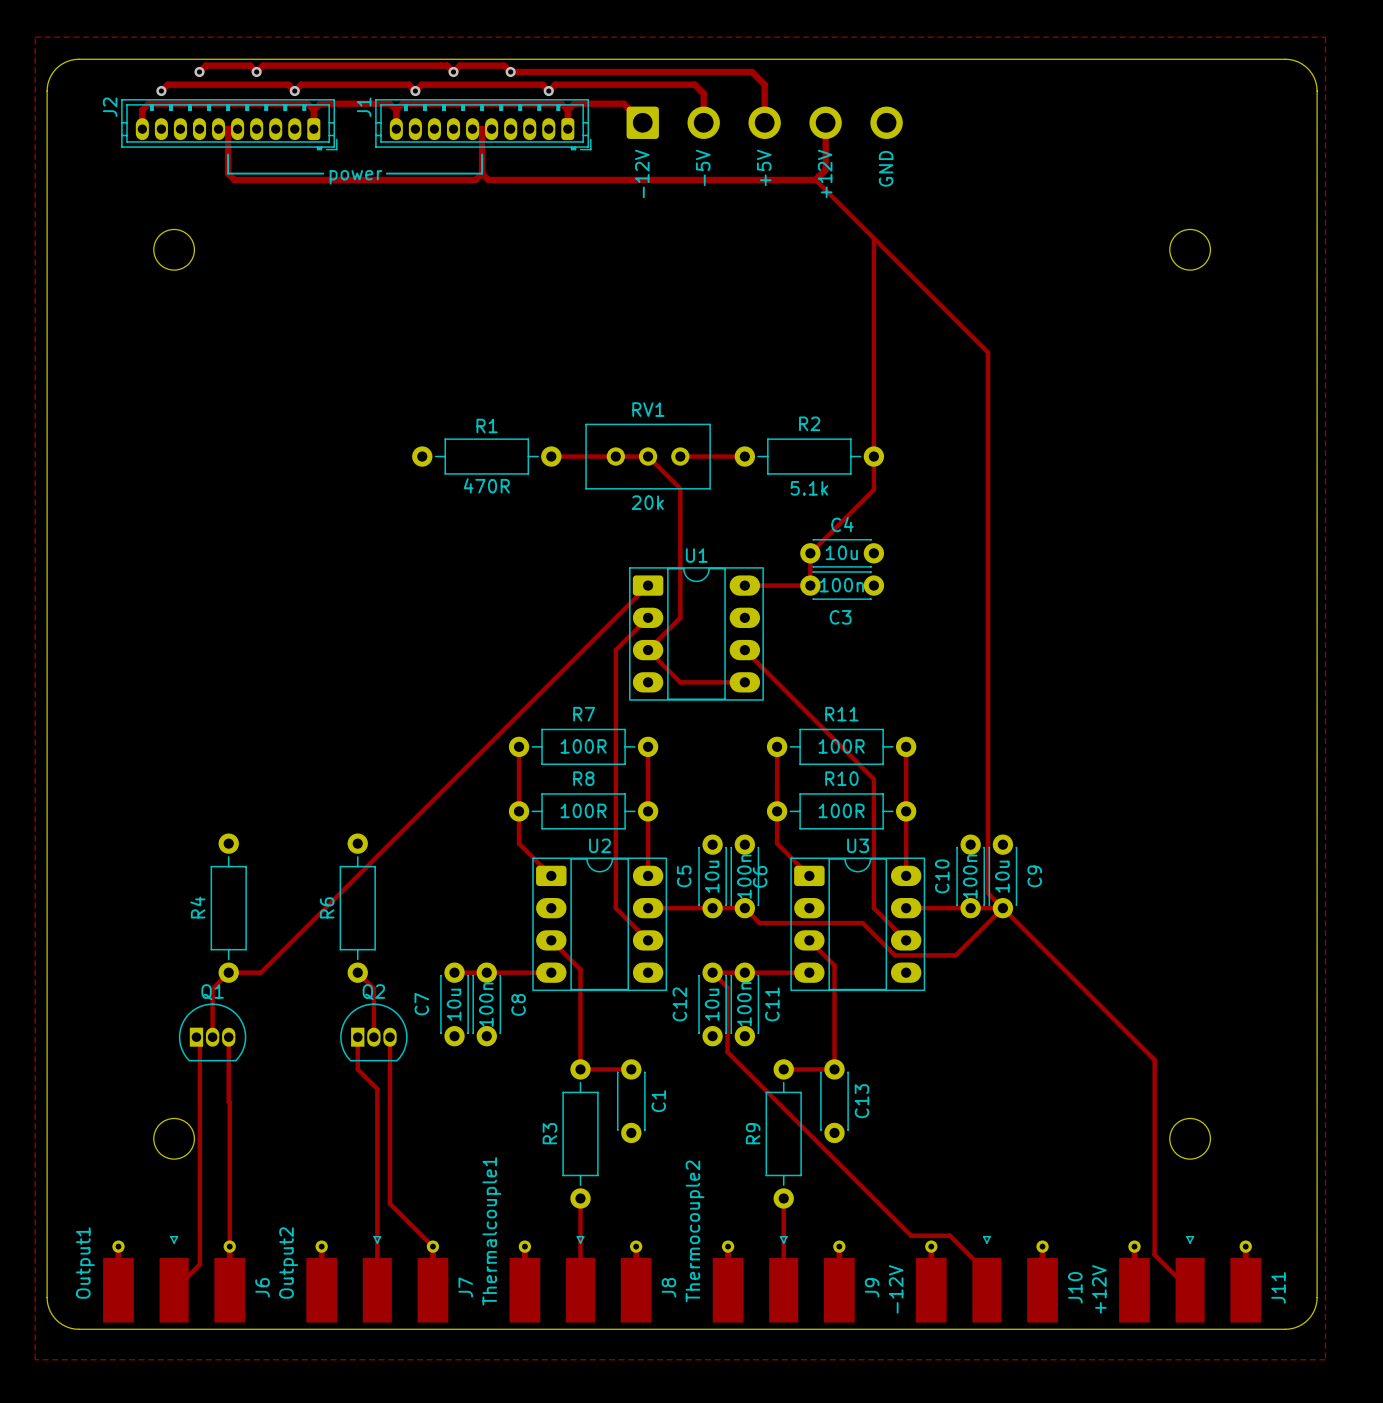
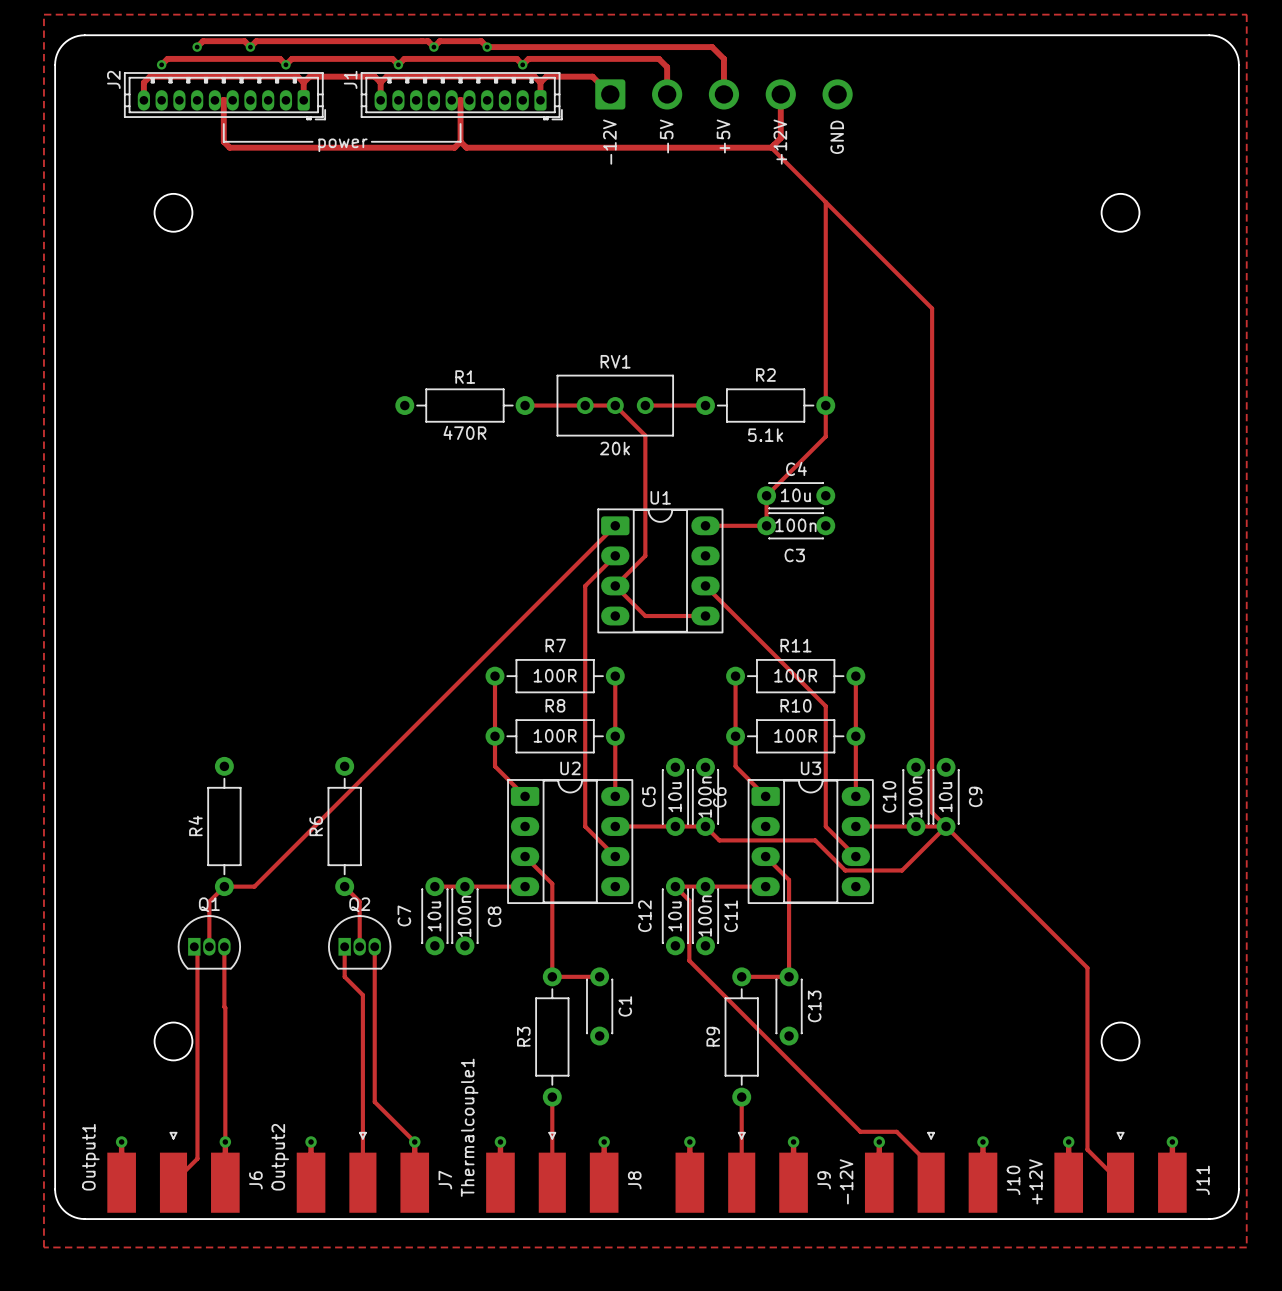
J9 value: Thermocouple2 (695, 1231) -> none

